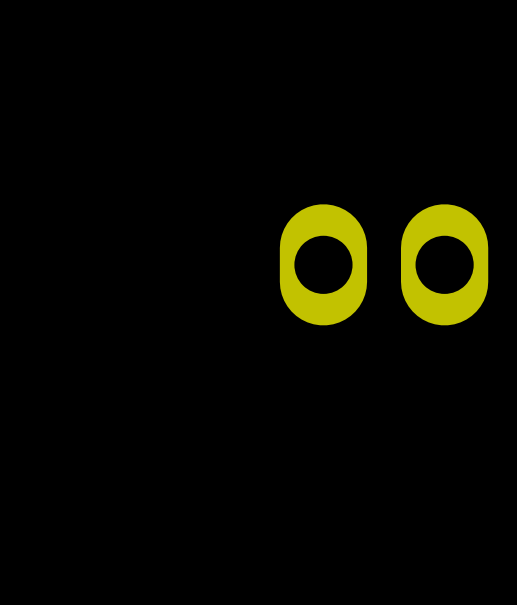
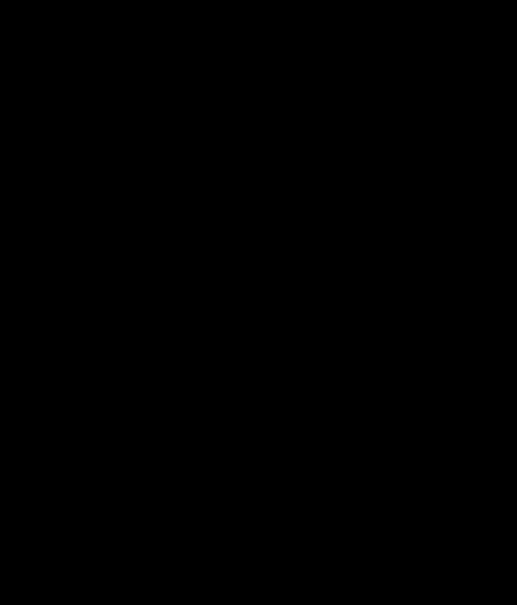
part: (384, 264) -> none

